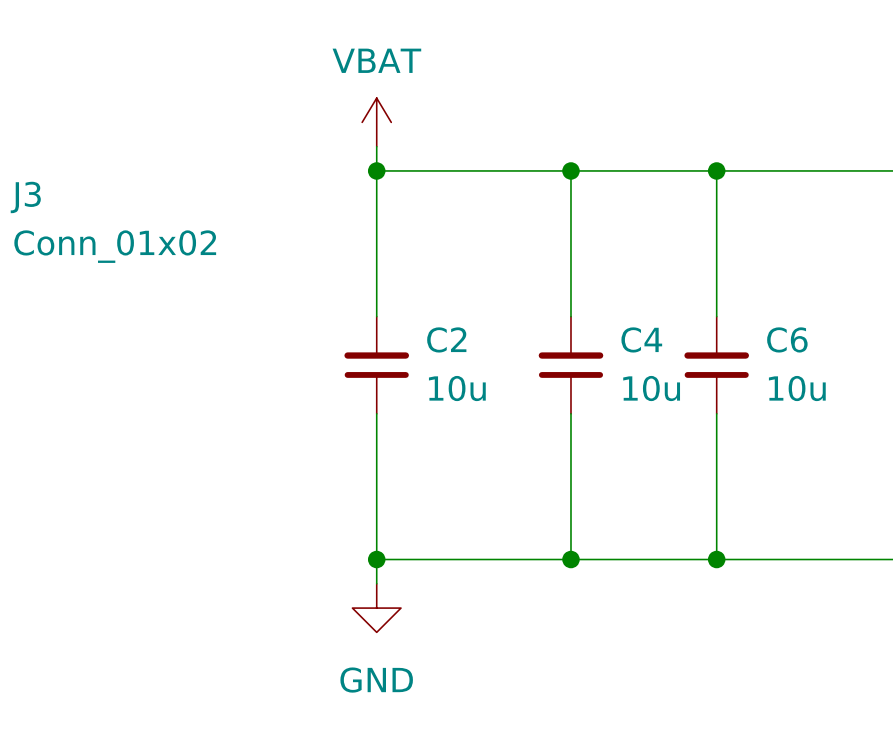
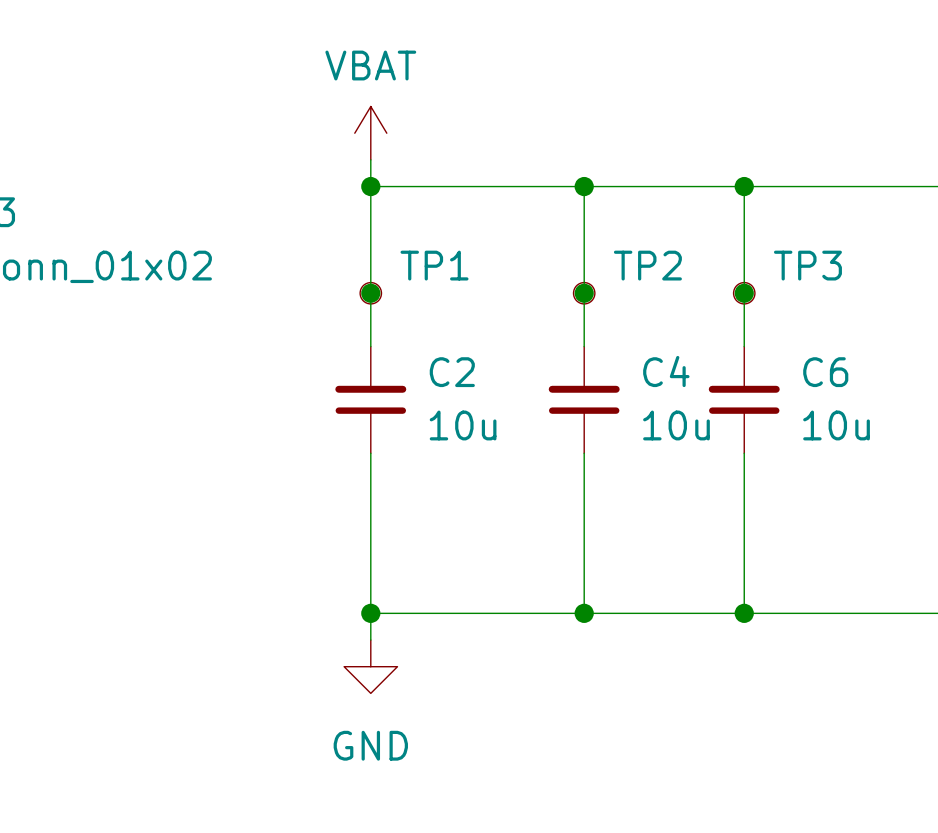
junction: none -> (370, 293)
TP1: none -> (370, 293)
junction: none -> (584, 293)
TP2: none -> (584, 293)
junction: none -> (744, 293)
TP3: none -> (744, 293)

